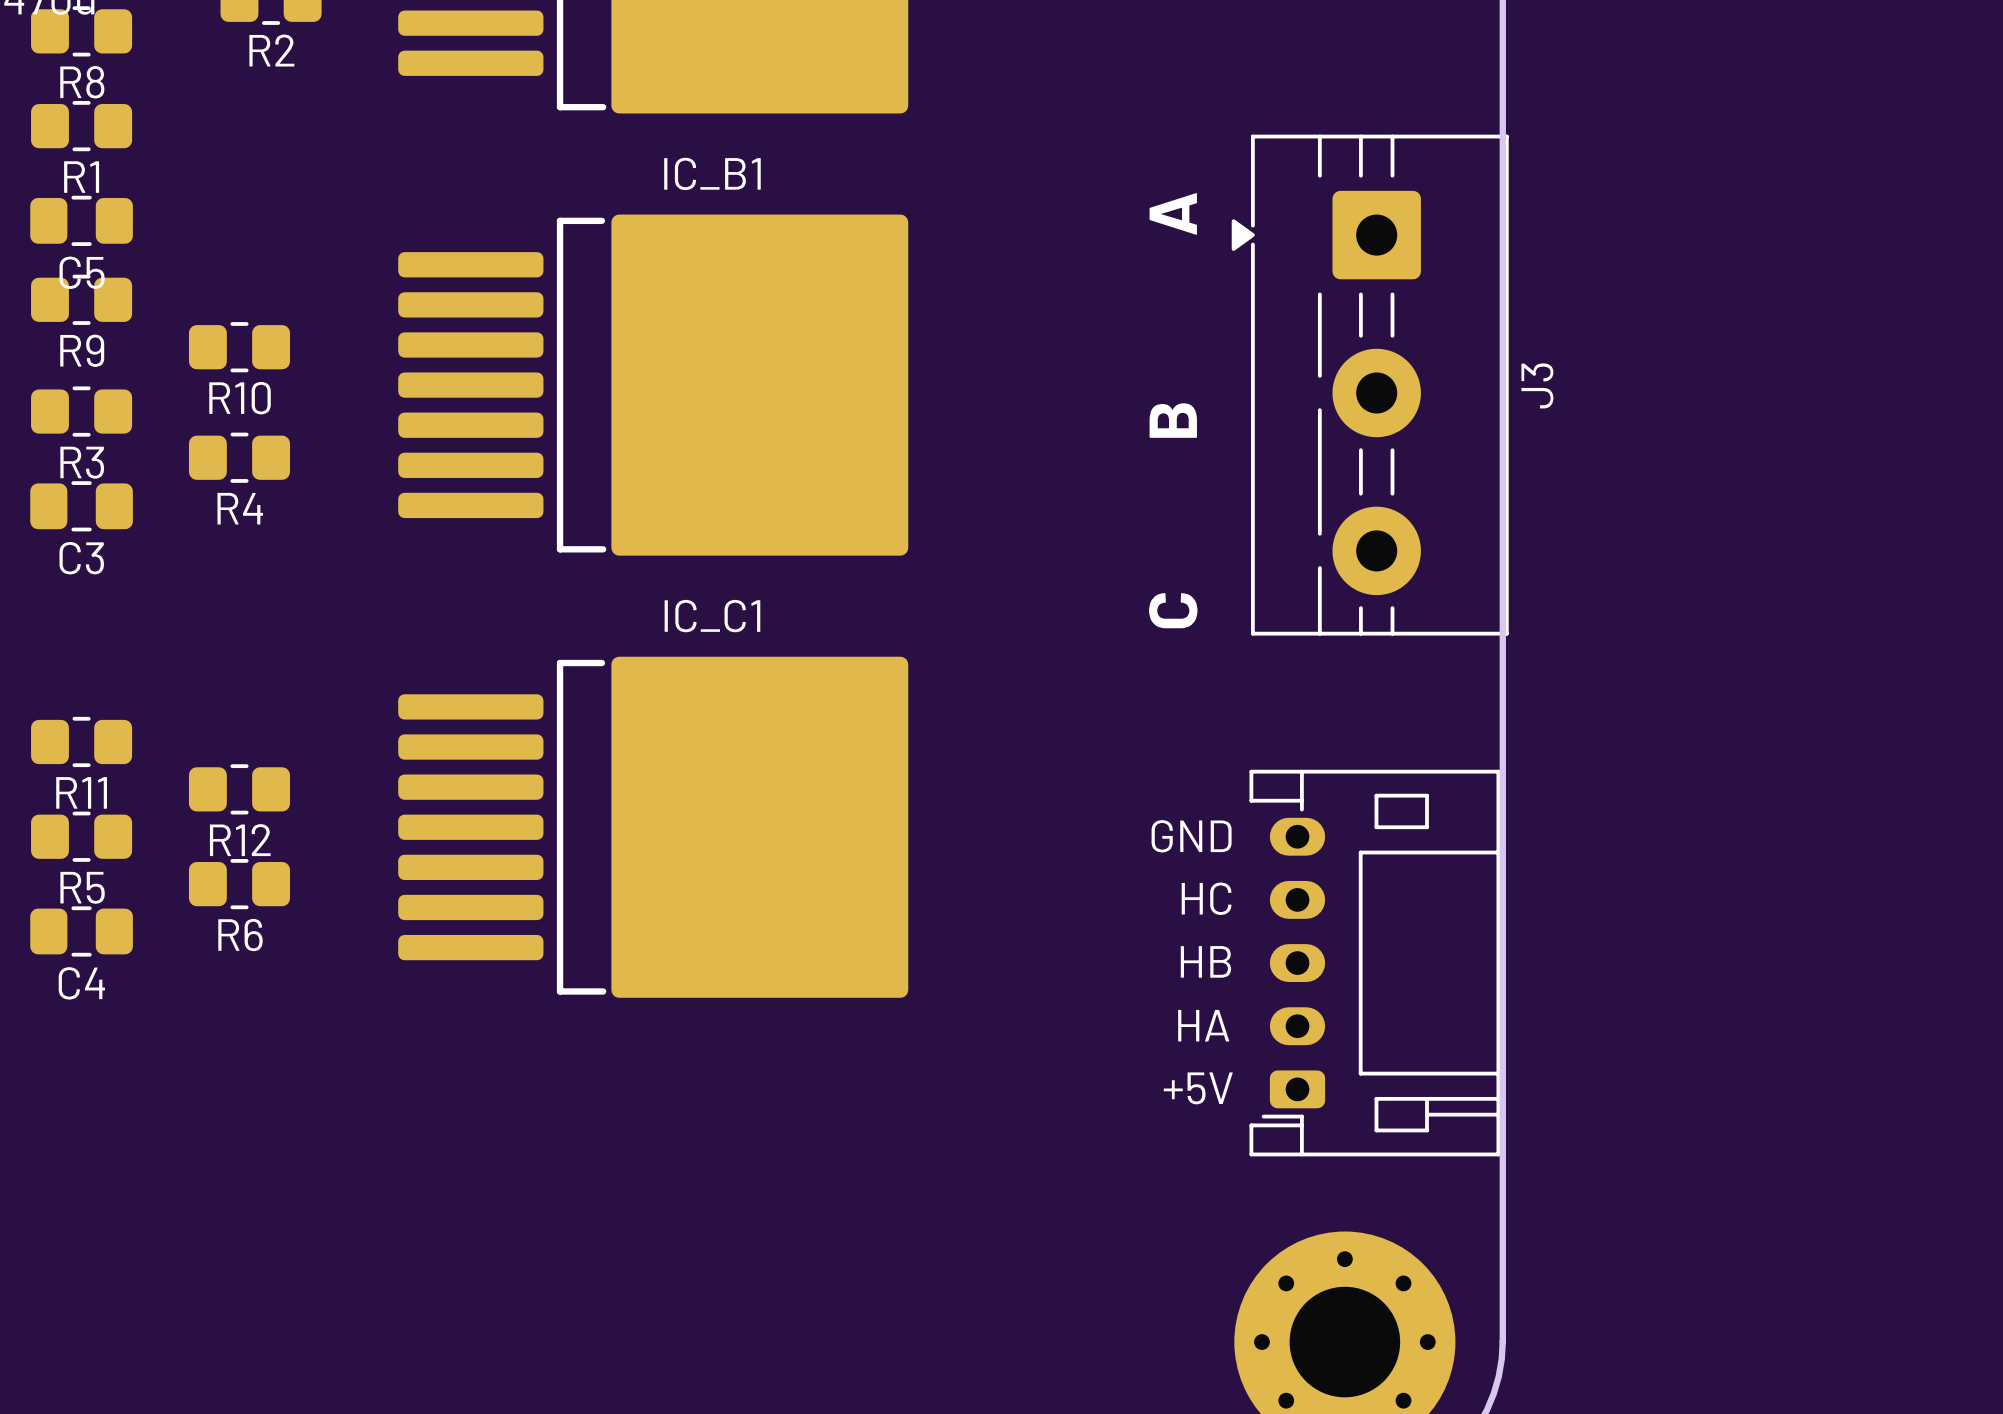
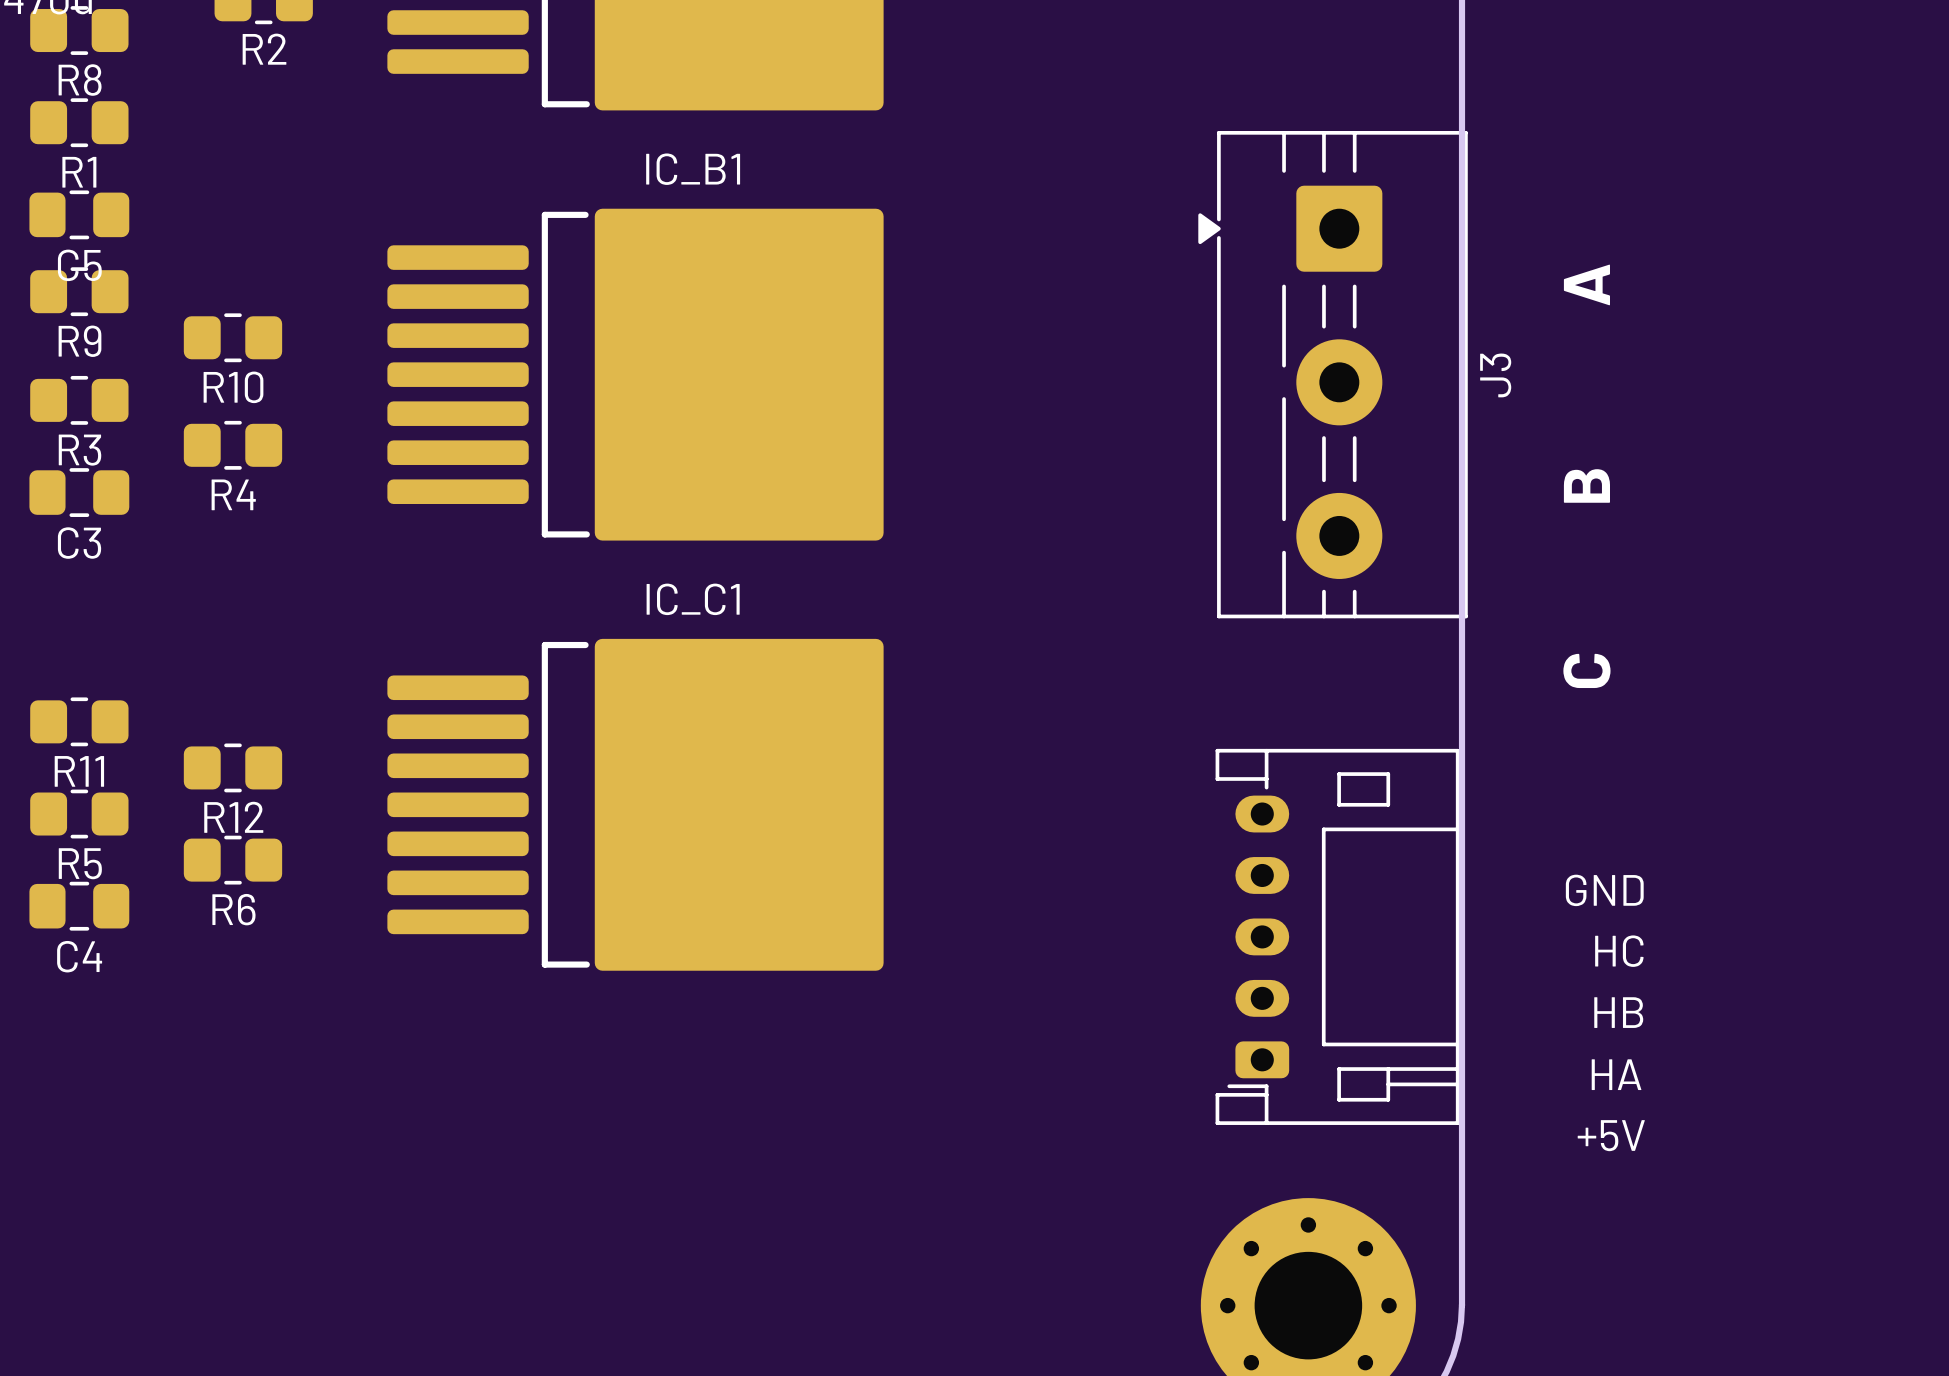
text position: A (1173, 213) -> A (1586, 284)
text position: B (1173, 420) -> B (1586, 485)
text position: C (1173, 610) -> C (1586, 670)
text position: GND (1191, 836) -> GND (1604, 890)
text position: HC (1206, 898) -> HC (1619, 951)
text position: HB (1205, 961) -> HB (1618, 1012)
text position: HA (1203, 1025) -> HA (1616, 1074)
text position: +5V (1198, 1088) -> +5V (1611, 1135)

